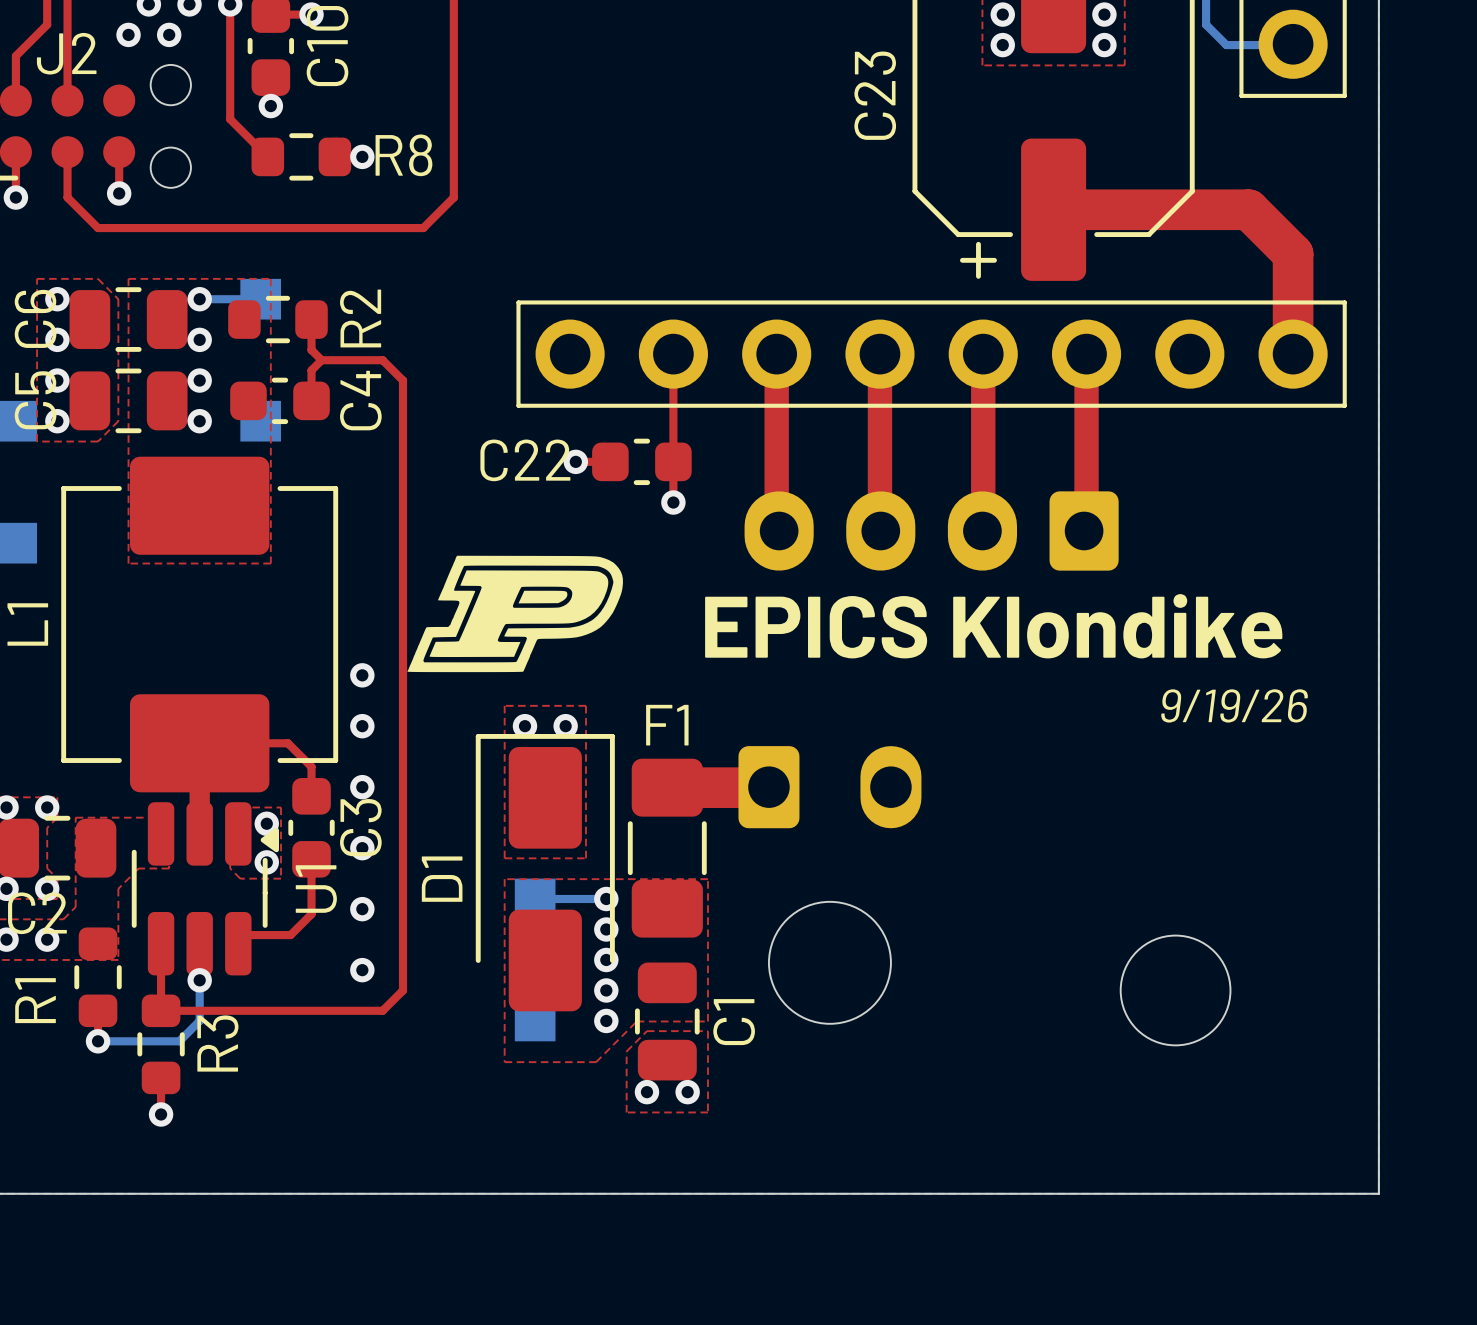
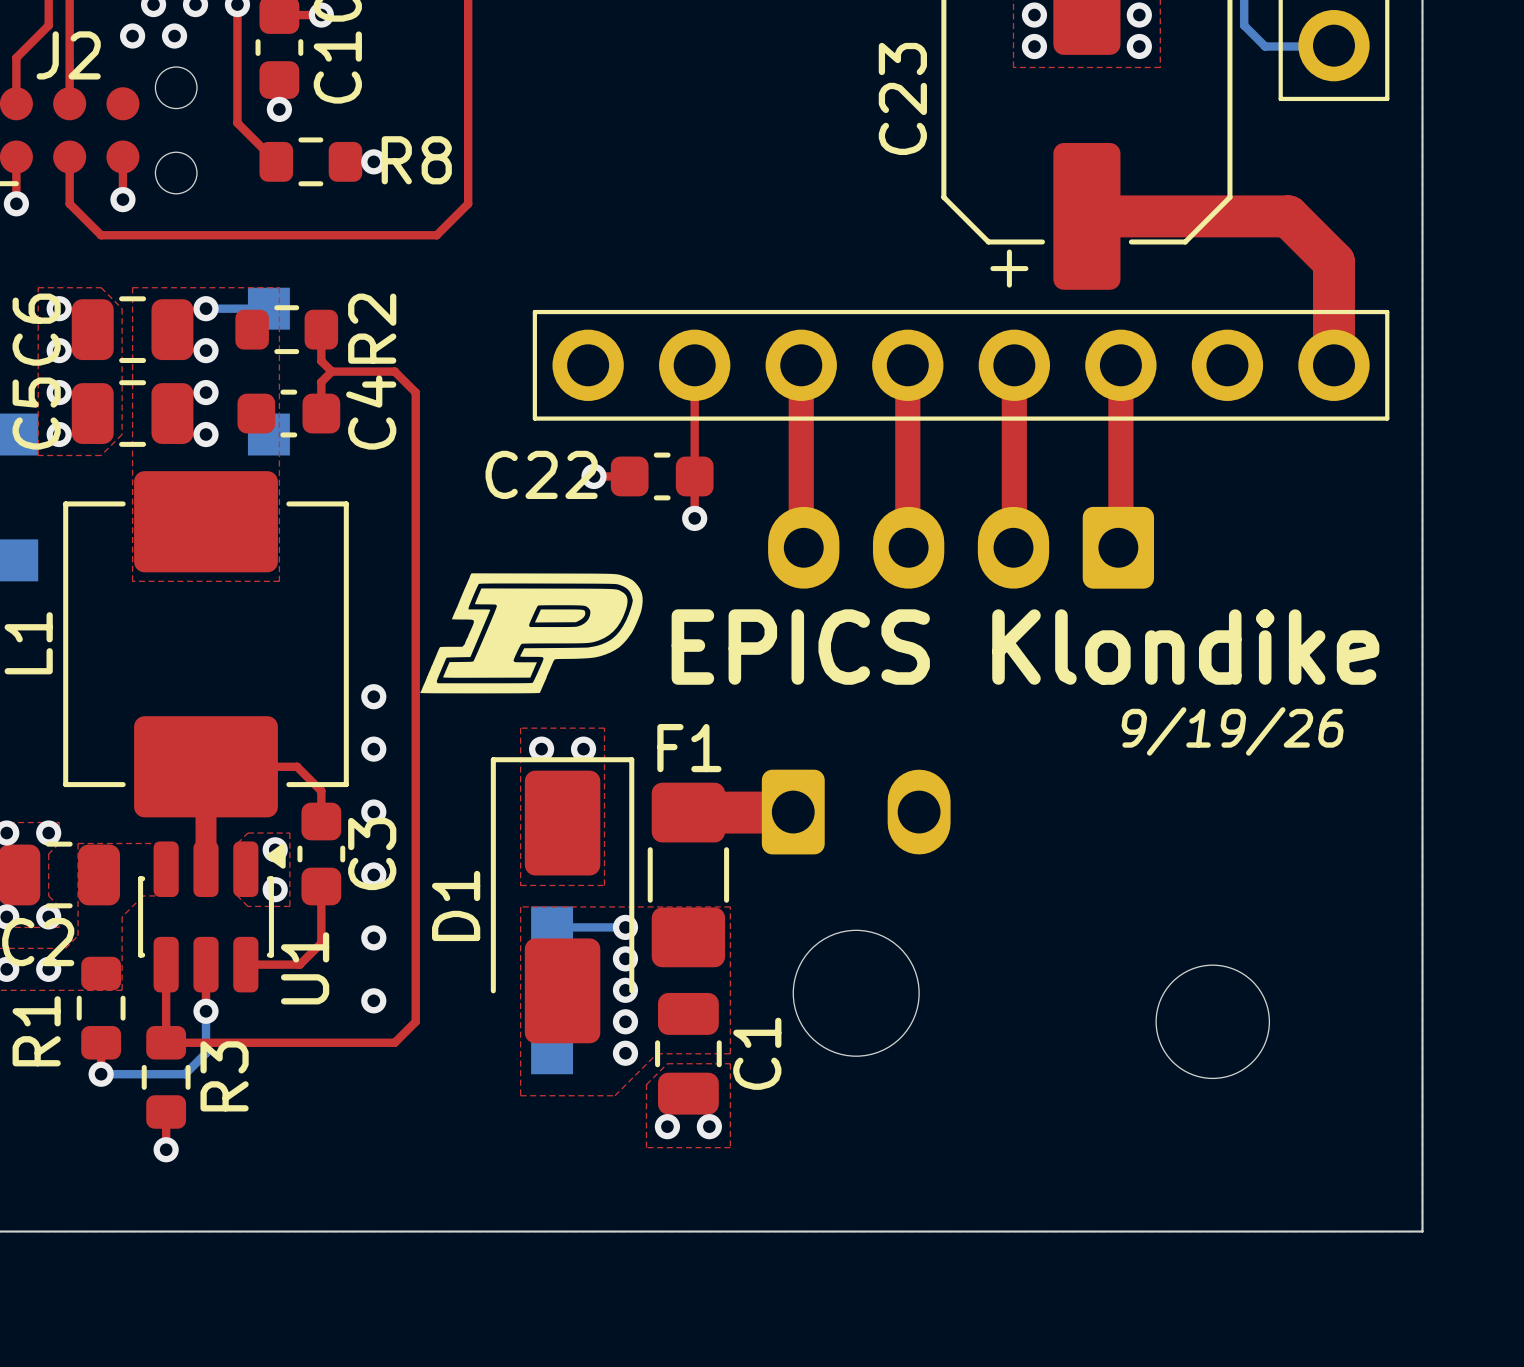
U1 footprint: [131, 802, 279, 976] -> [138, 841, 286, 993]
U1 name position: U1 (316, 889) -> U1 (305, 968)

